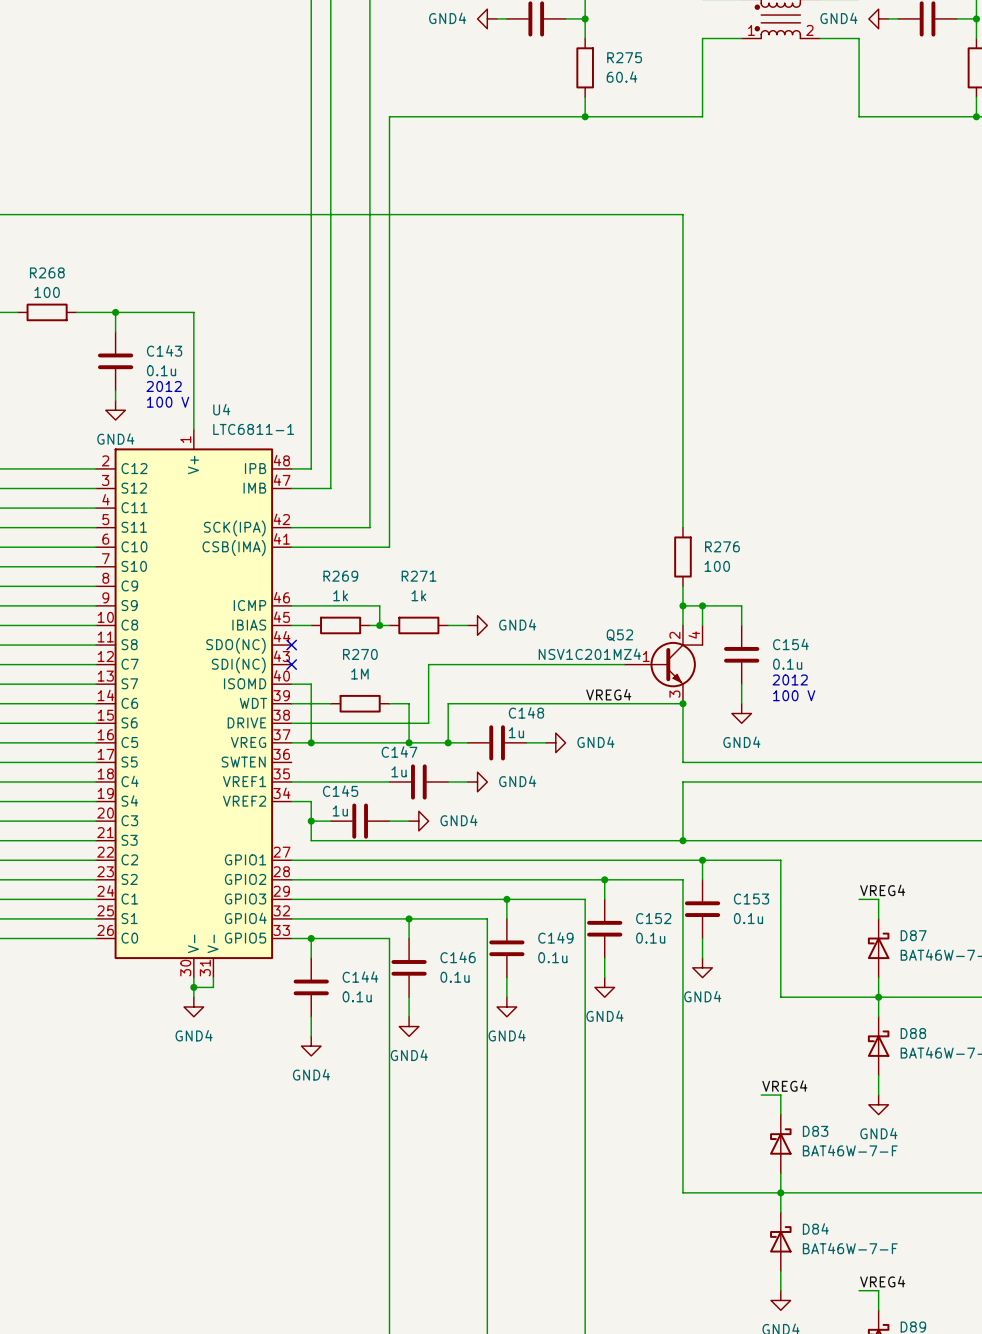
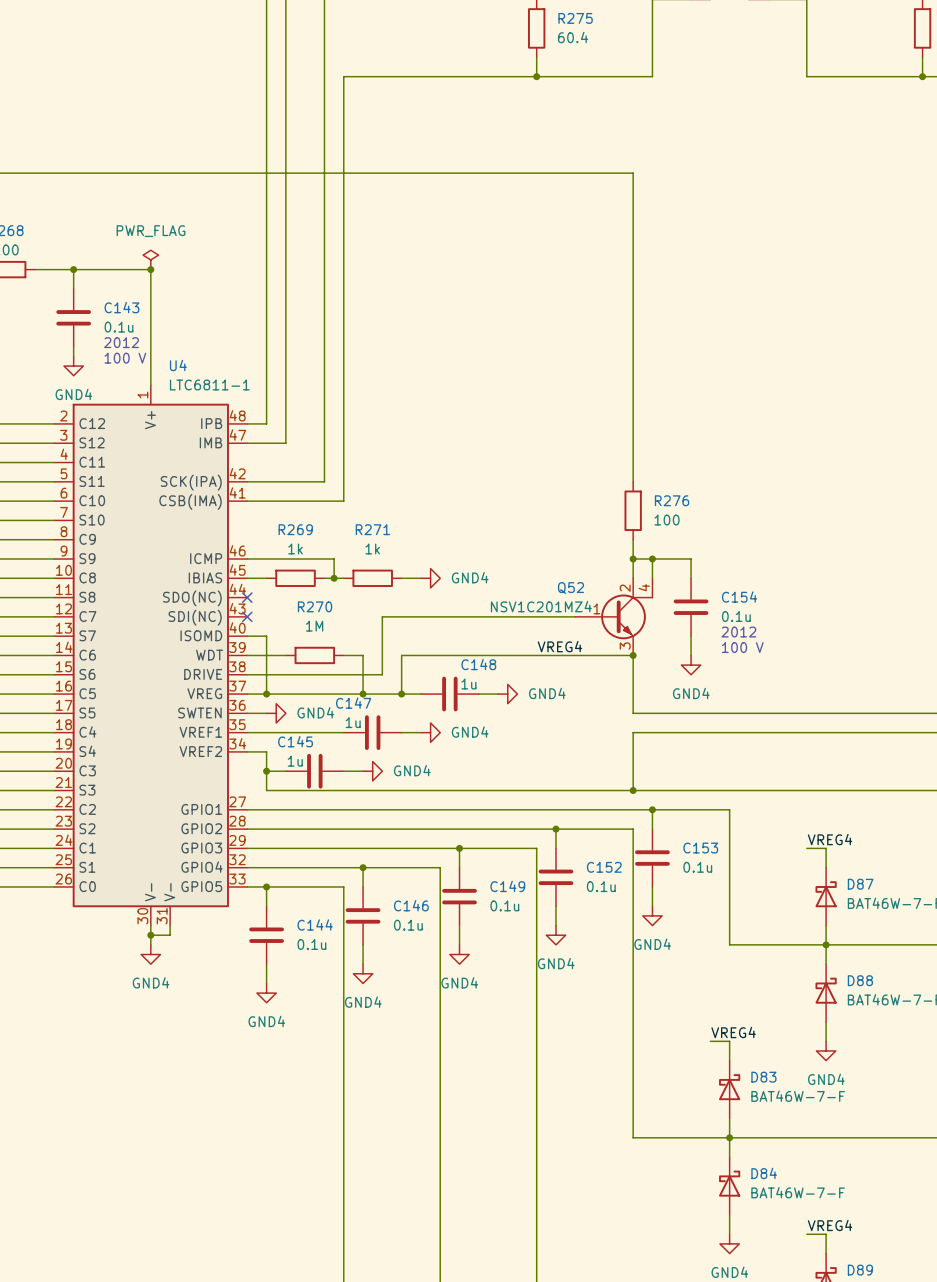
power symbol: none -> PWR_FLAG (150, 259)
junction: none -> (150, 269)
wire: none -> (247, 713) (266, 713)
power symbol: none -> GND4 (276, 713)

